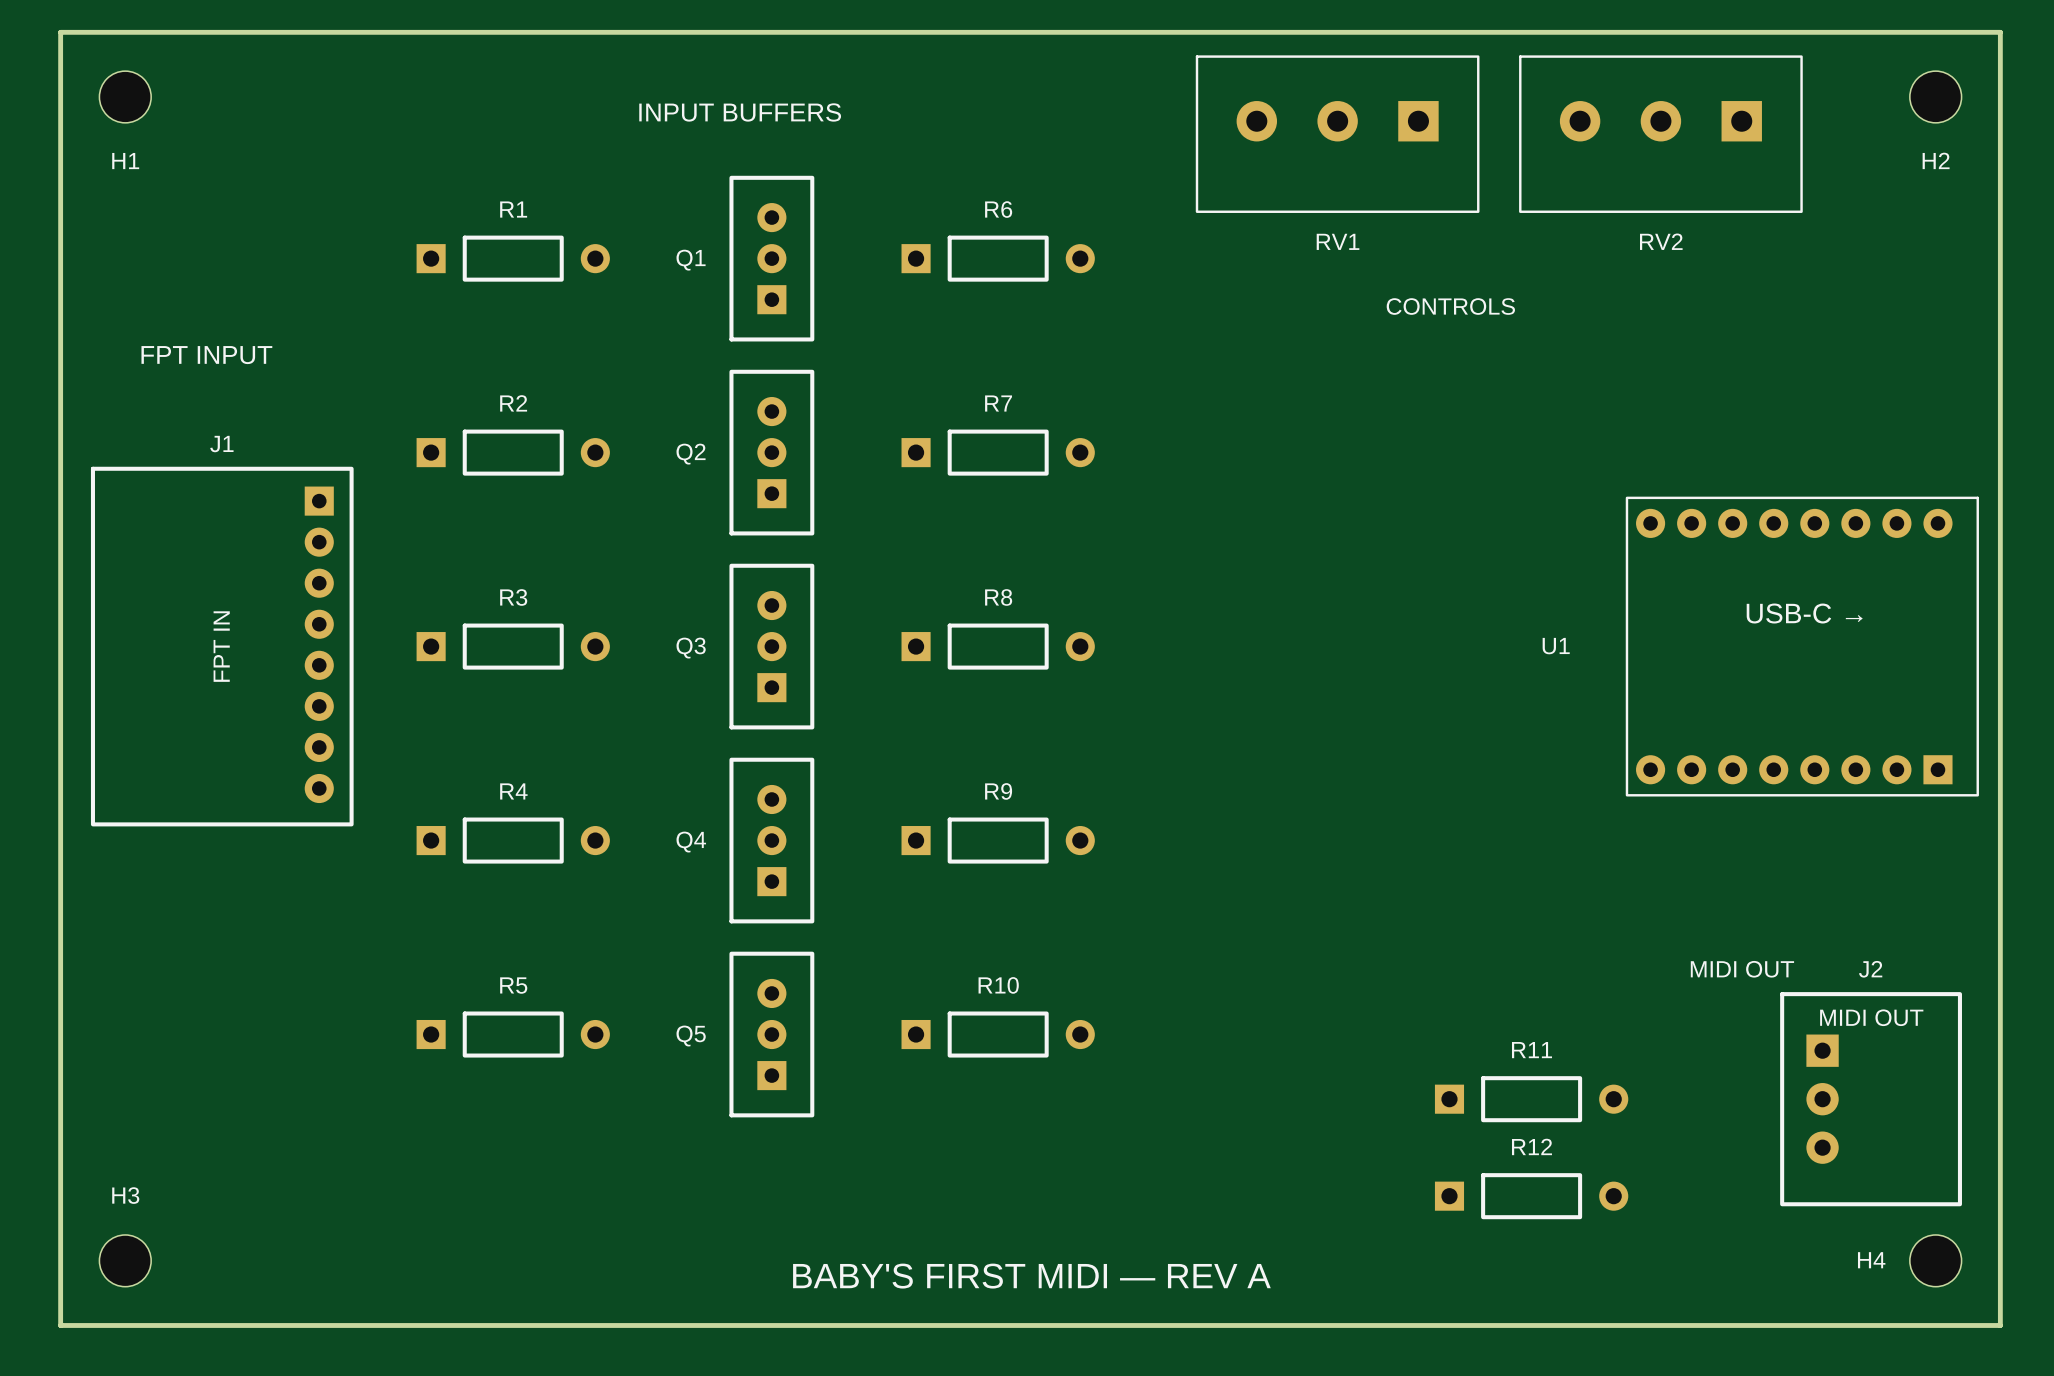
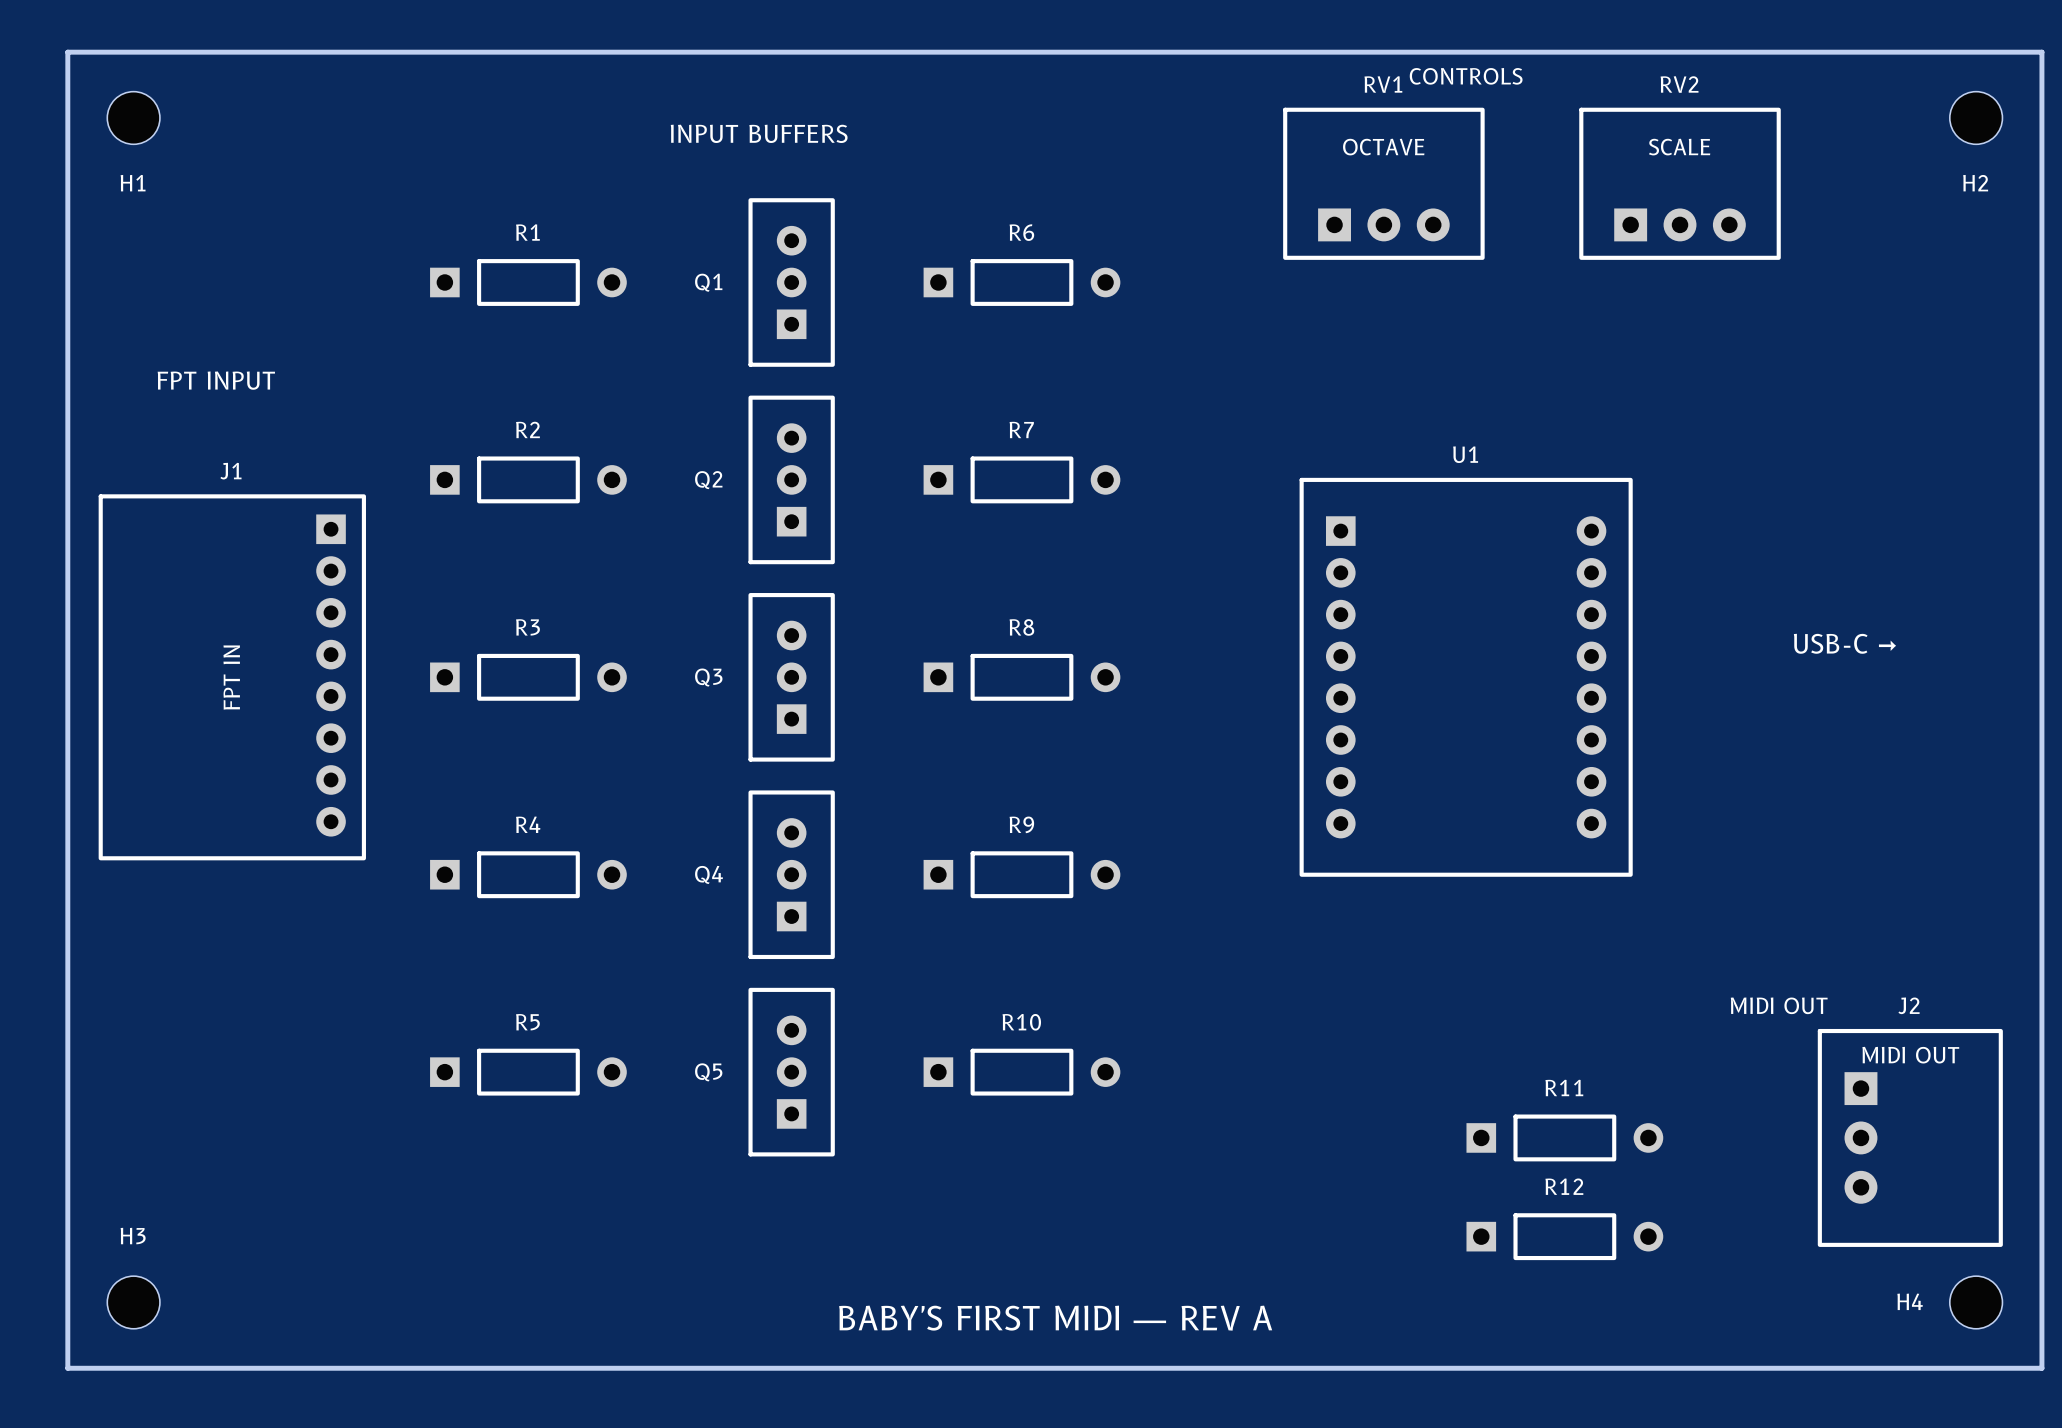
RV1 footprint: [1195, 55, 1480, 213] -> [1283, 107, 1485, 260]
RV2 footprint: [1519, 55, 1803, 213] -> [1579, 107, 1781, 260]
RV1 name position: RV1 (1338, 241) -> RV1 (1383, 84)
RV2 name position: RV2 (1661, 241) -> RV2 (1679, 84)
text position: CONTROLS (1450, 306) -> CONTROLS (1466, 76)
U1 footprint: [1625, 496, 1979, 797] -> [1299, 477, 1633, 877]
U1 name position: U1 (1556, 646) -> U1 (1465, 454)

